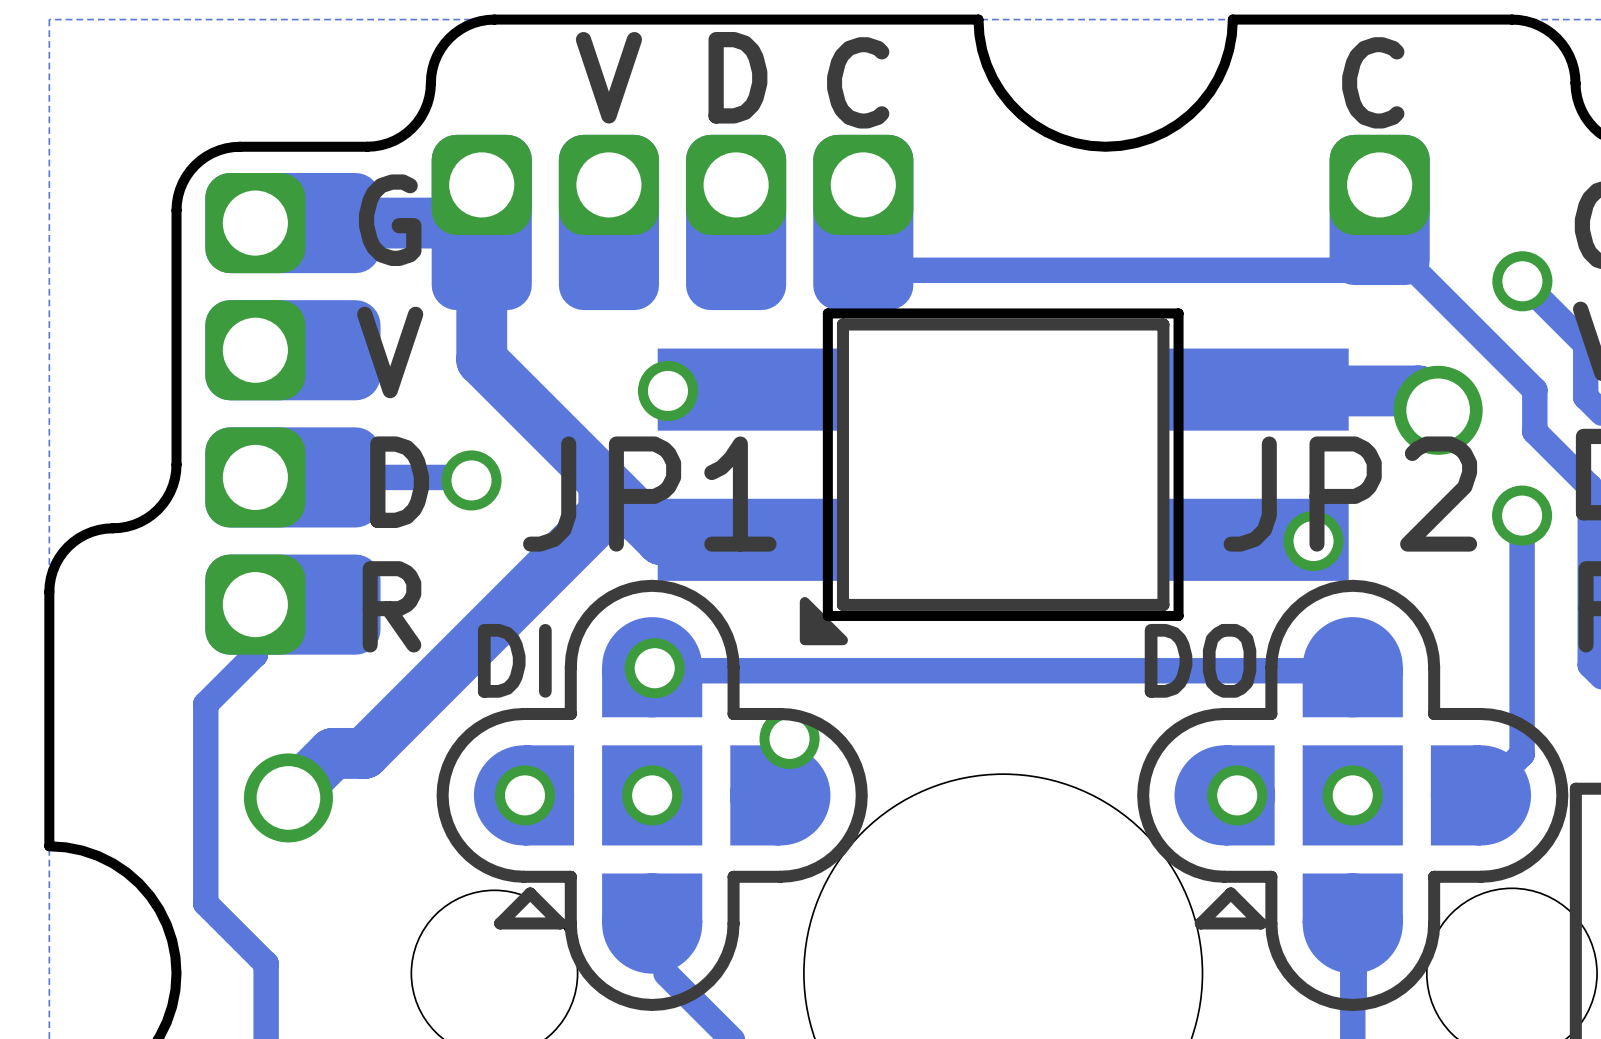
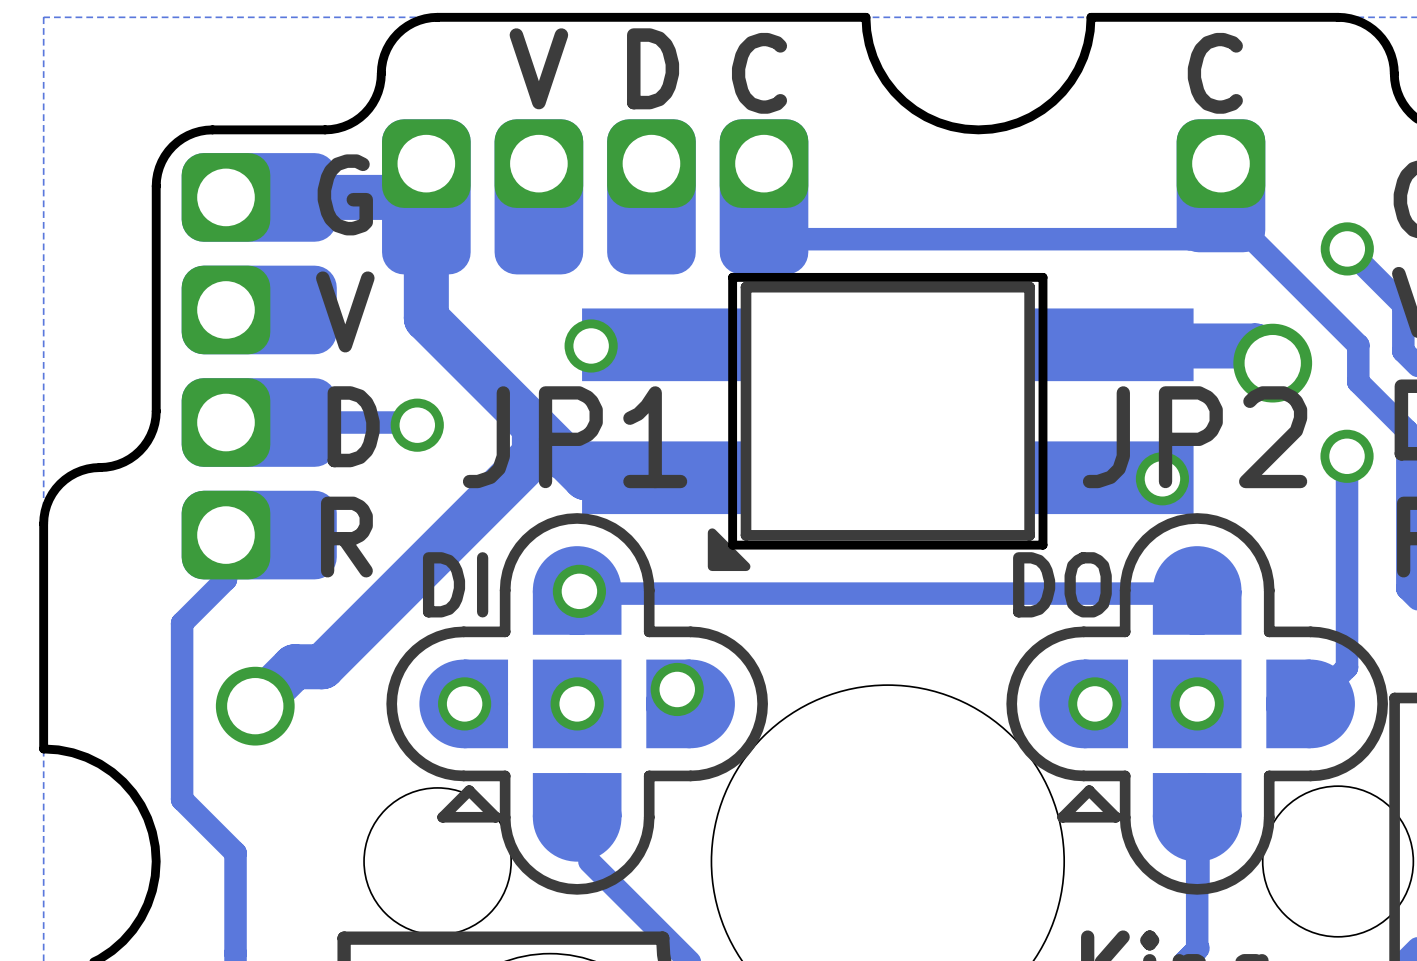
via position: (789, 738) -> (677, 689)

